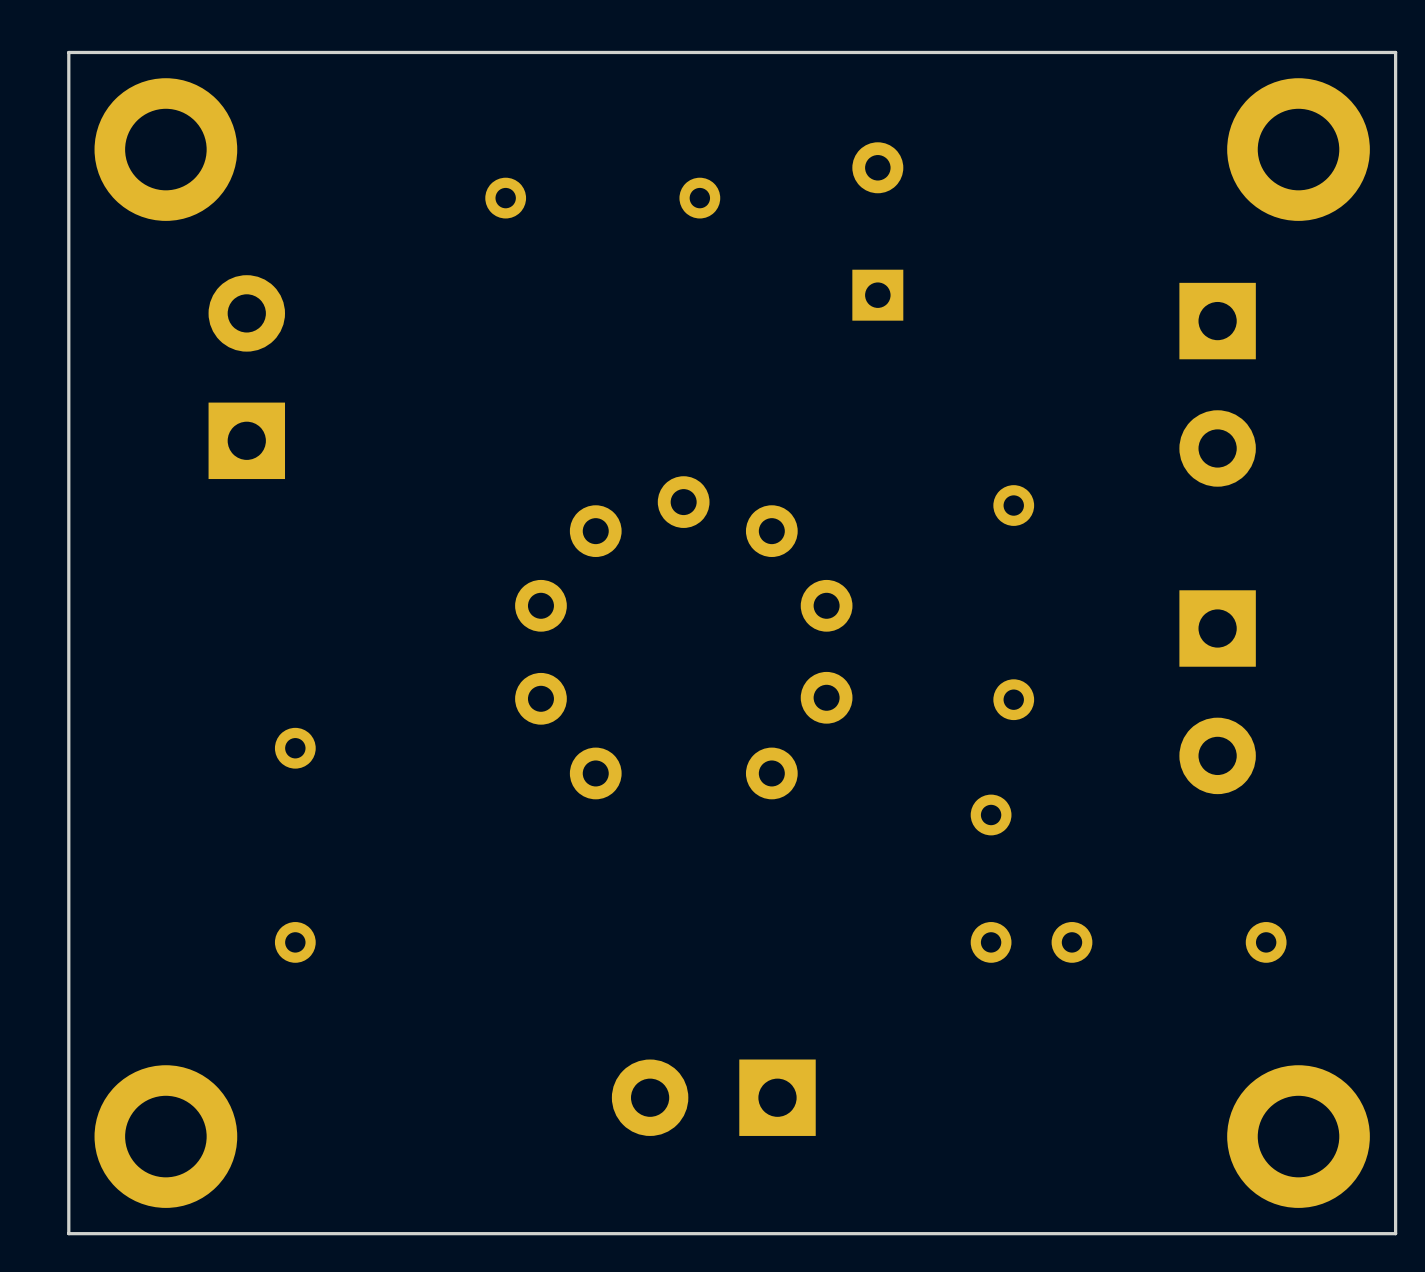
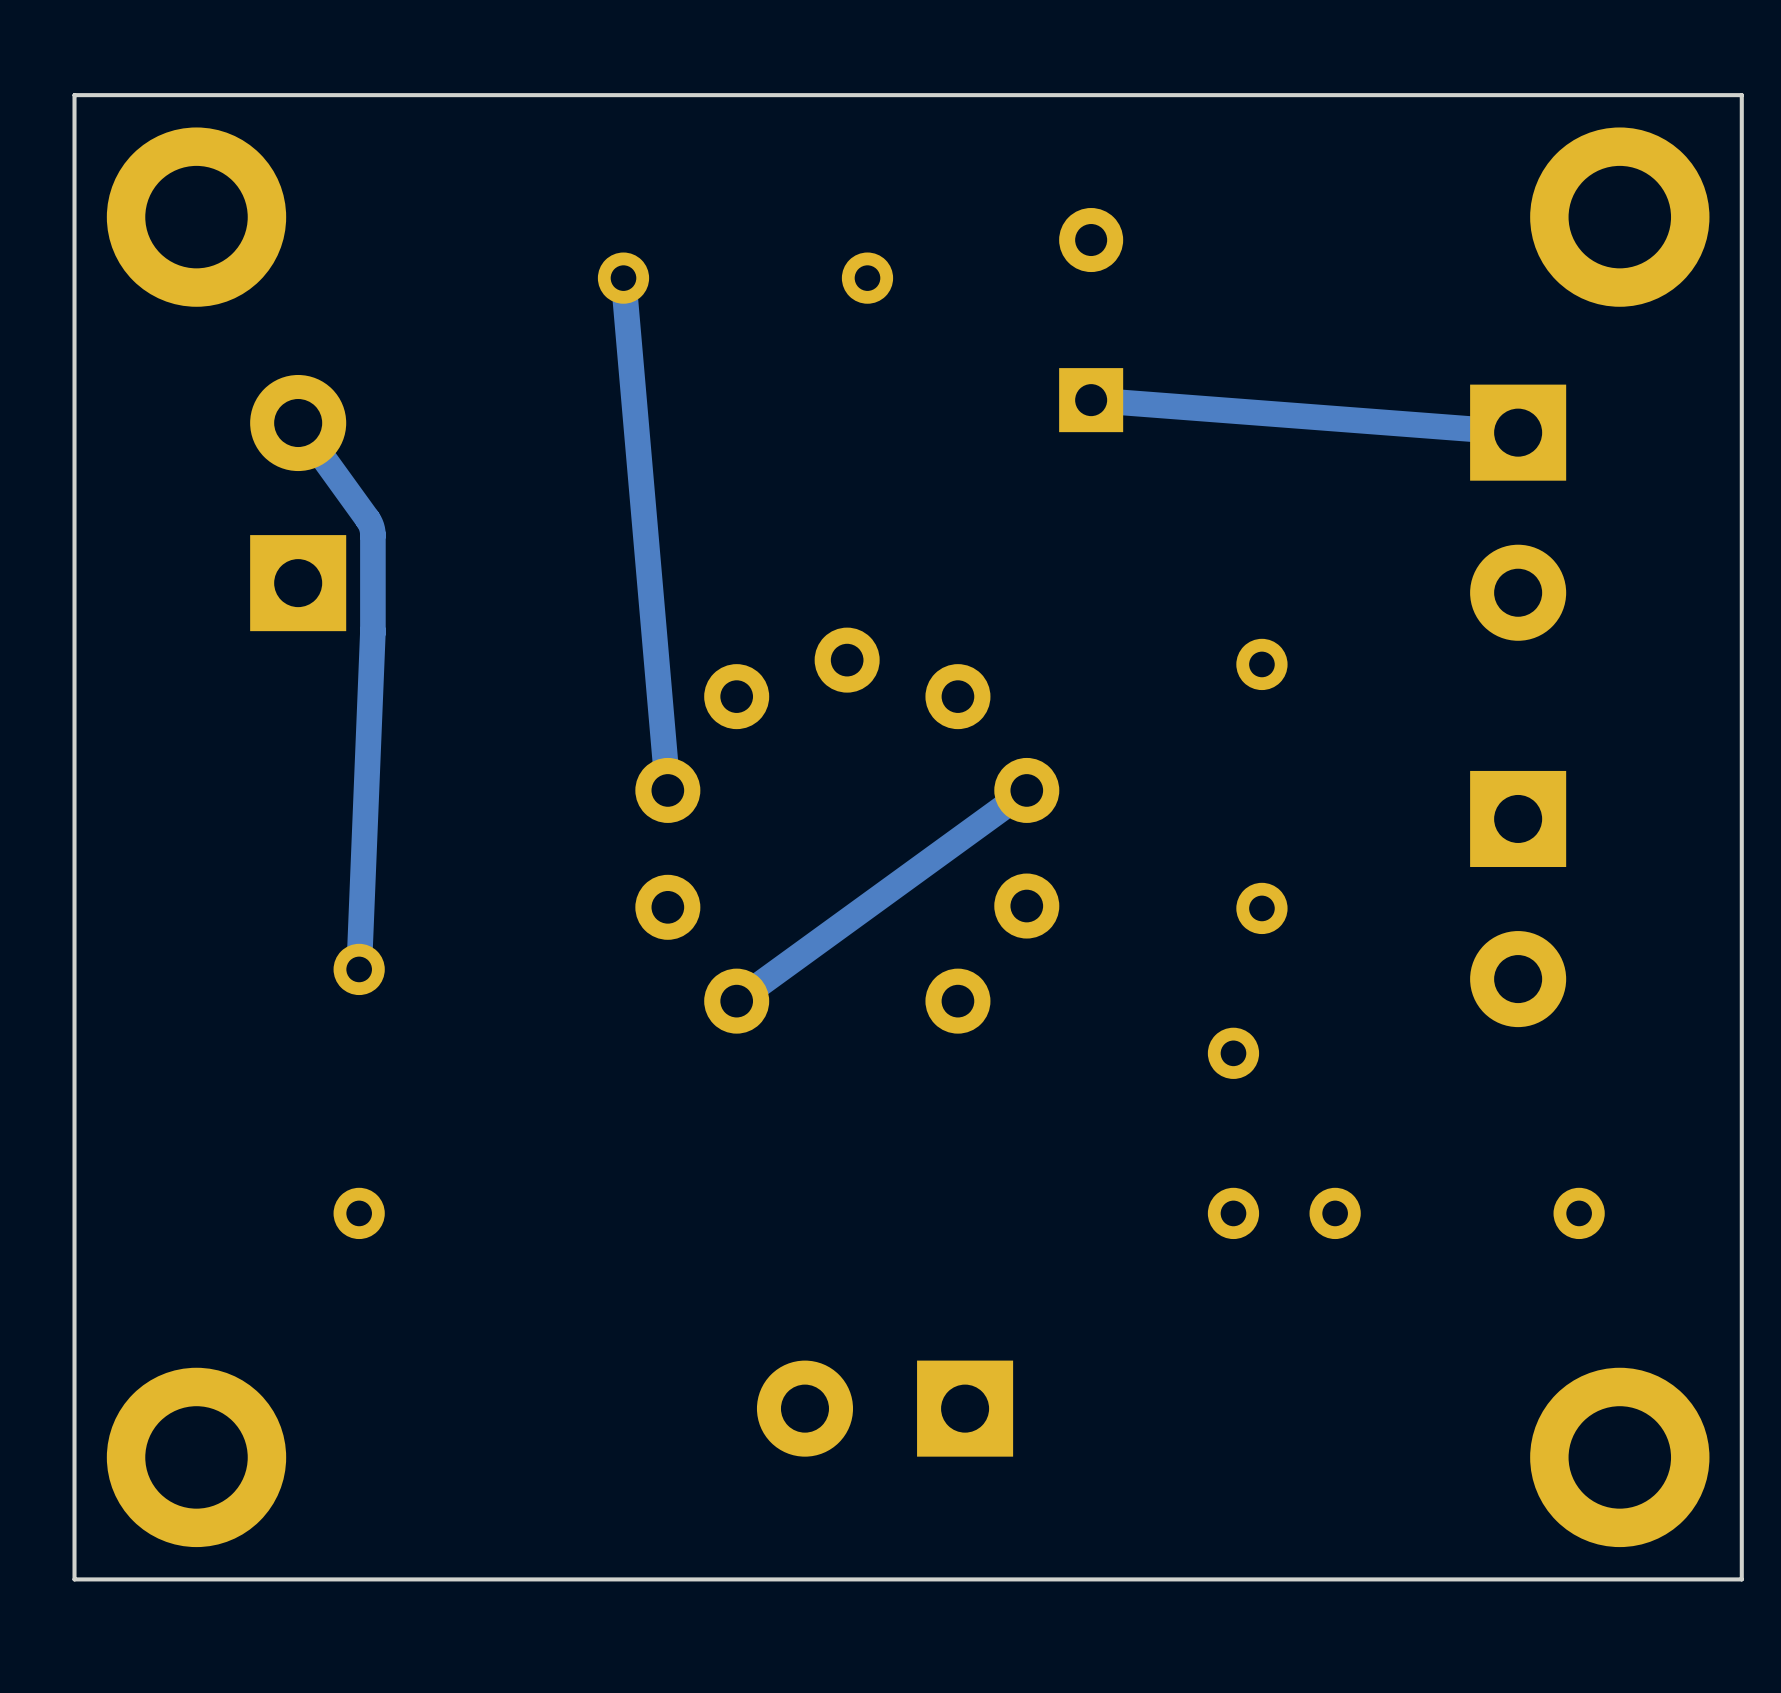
track: none -> (623, 278) (667, 790)
track: none -> (1091, 400) (1518, 432)
track: none -> (298, 423) (367, 519) (372, 532) (372, 632) (359, 969)
track: none -> (1026, 790) (736, 1001)

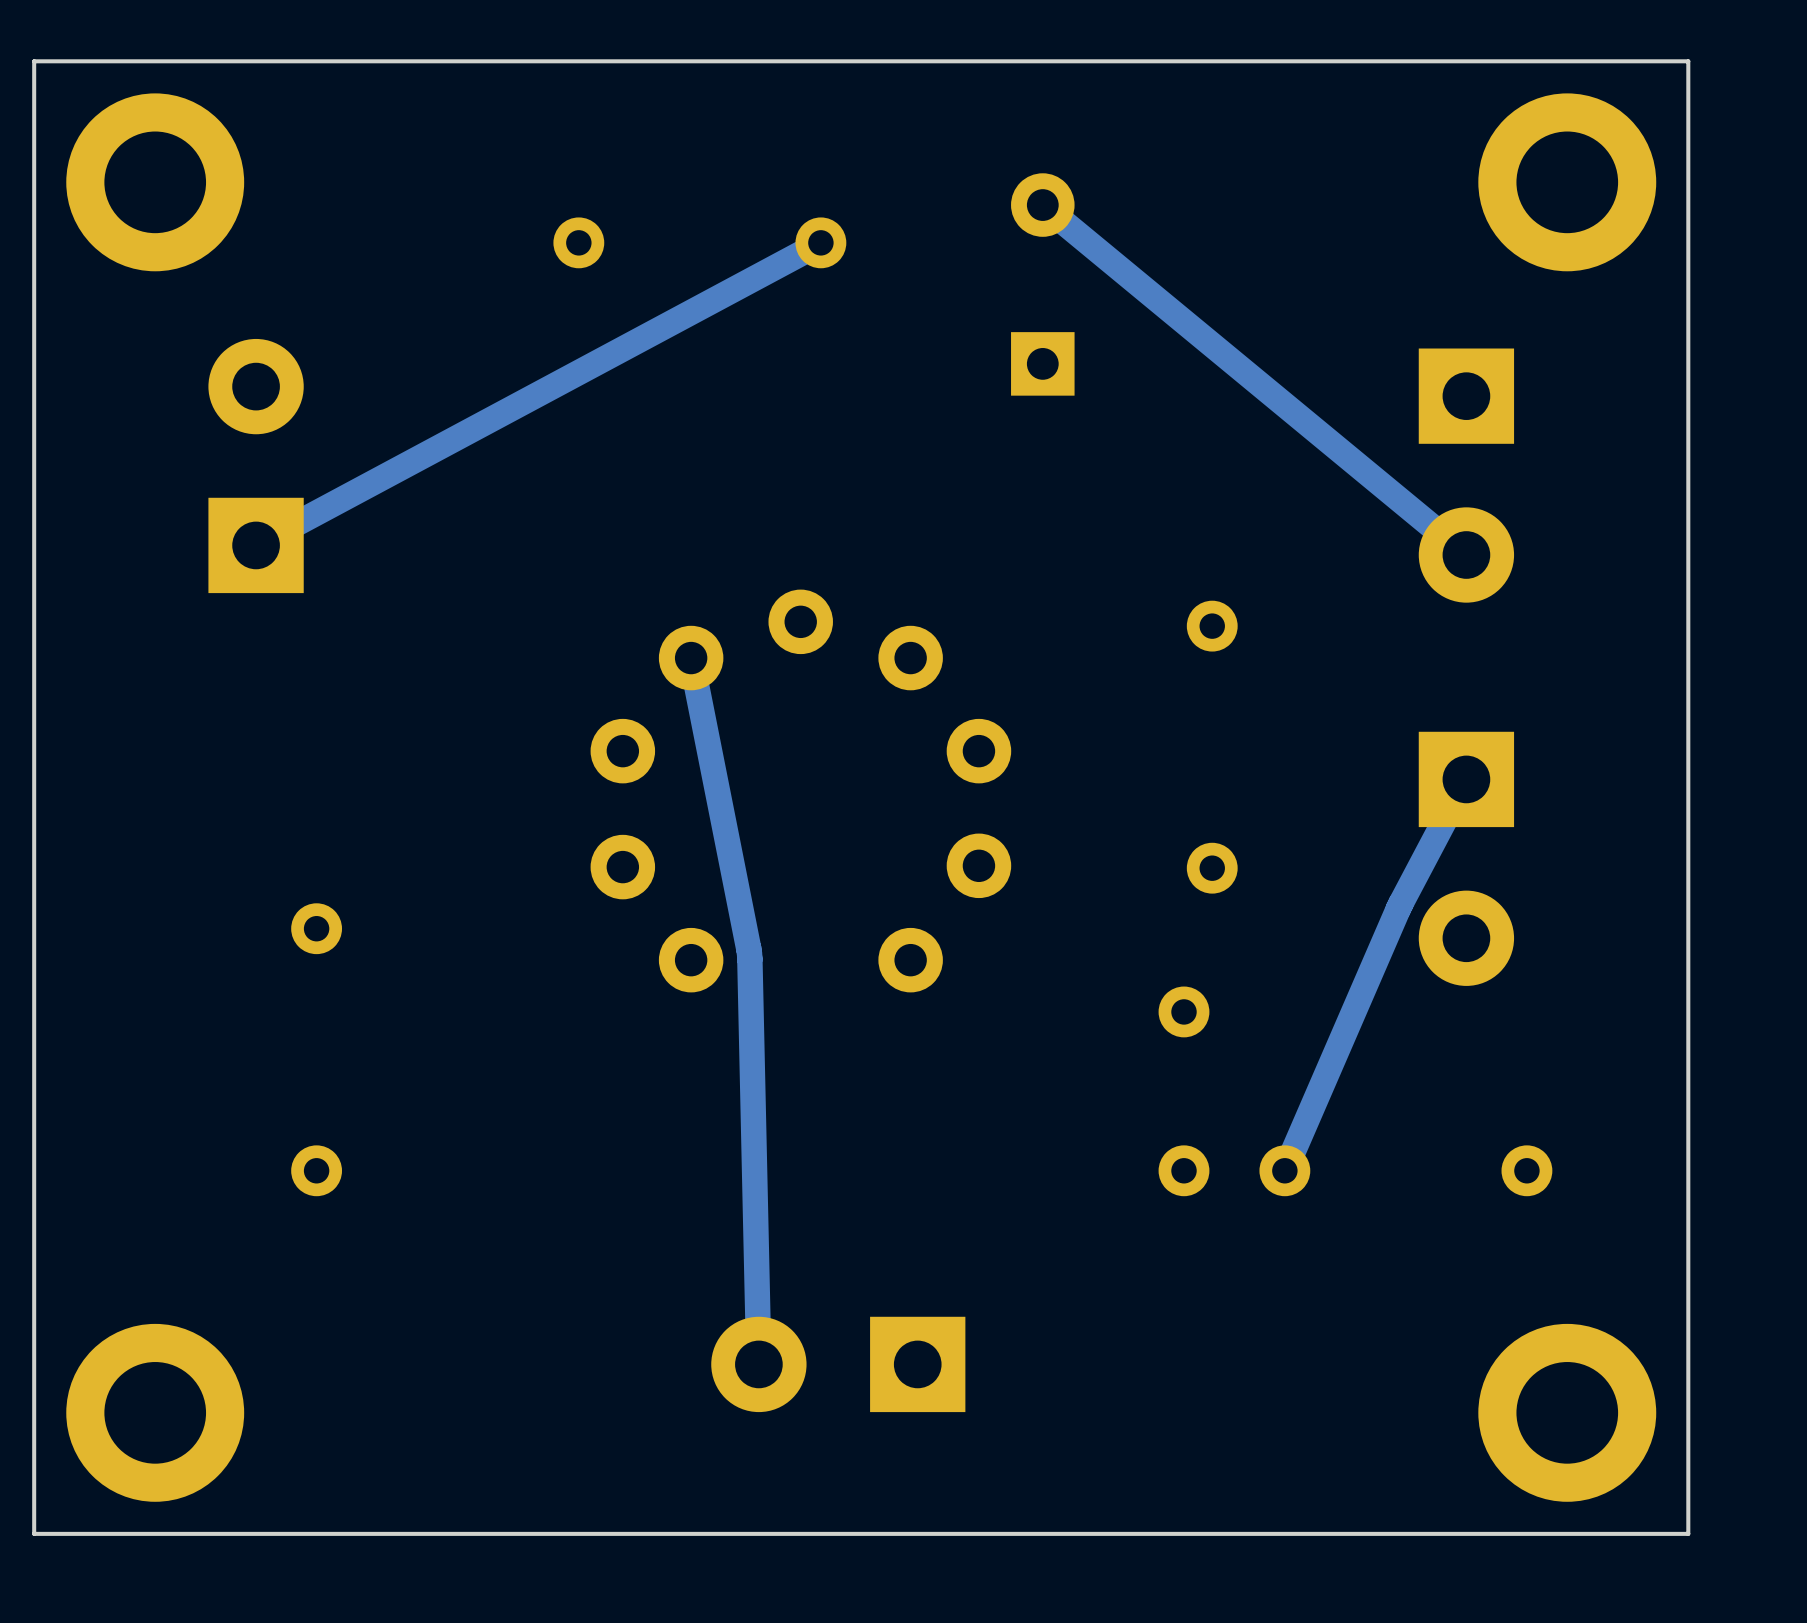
track: none -> (1042, 205) (1466, 555)
track: (623, 278) (667, 790) -> none
track: none -> (820, 242) (256, 545)
track: (1091, 400) (1518, 432) -> none
track: (298, 423) (367, 519) (372, 532) (372, 632) (359, 969) -> none
track: none -> (691, 658) (749, 953) (758, 1364)
track: (1026, 790) (736, 1001) -> none
track: none -> (1466, 779) (1398, 908) (1284, 1170)

